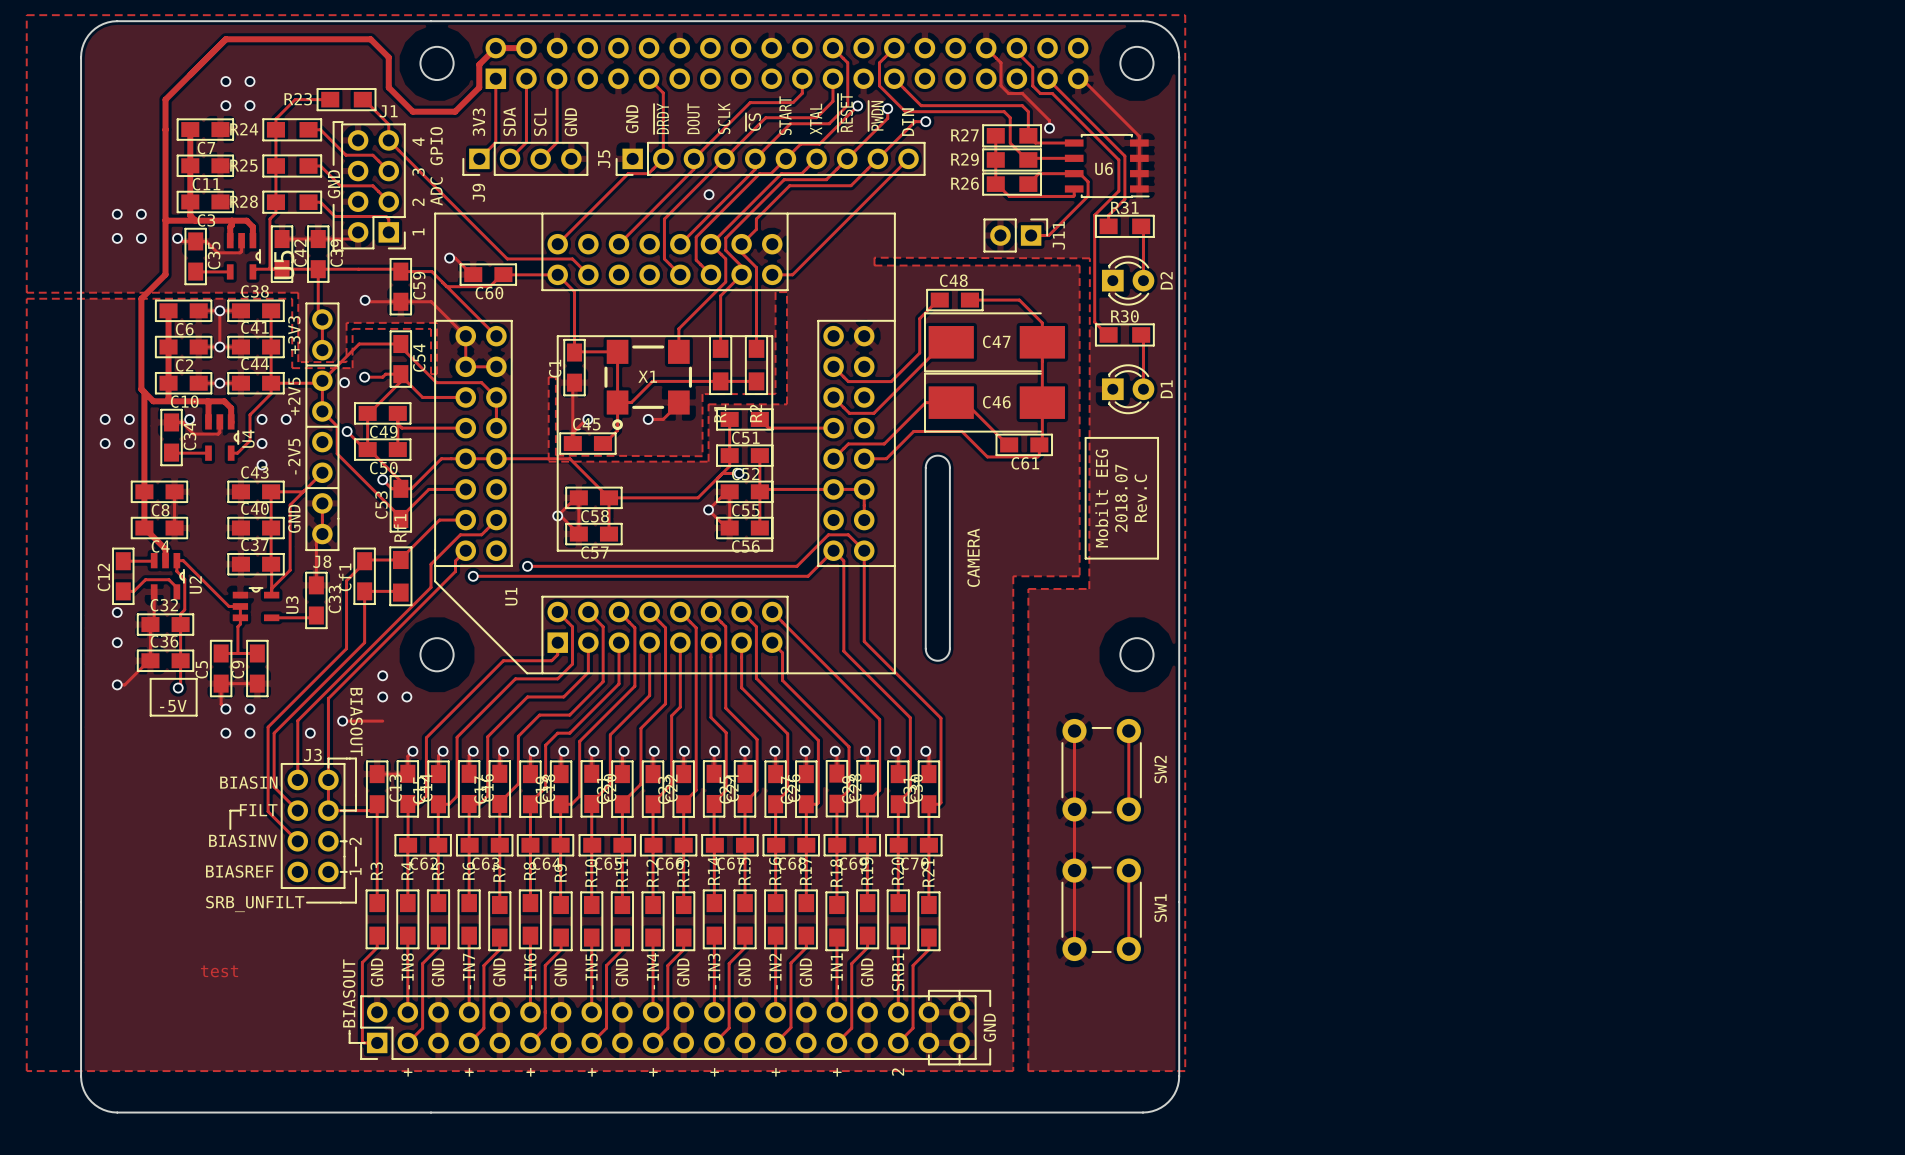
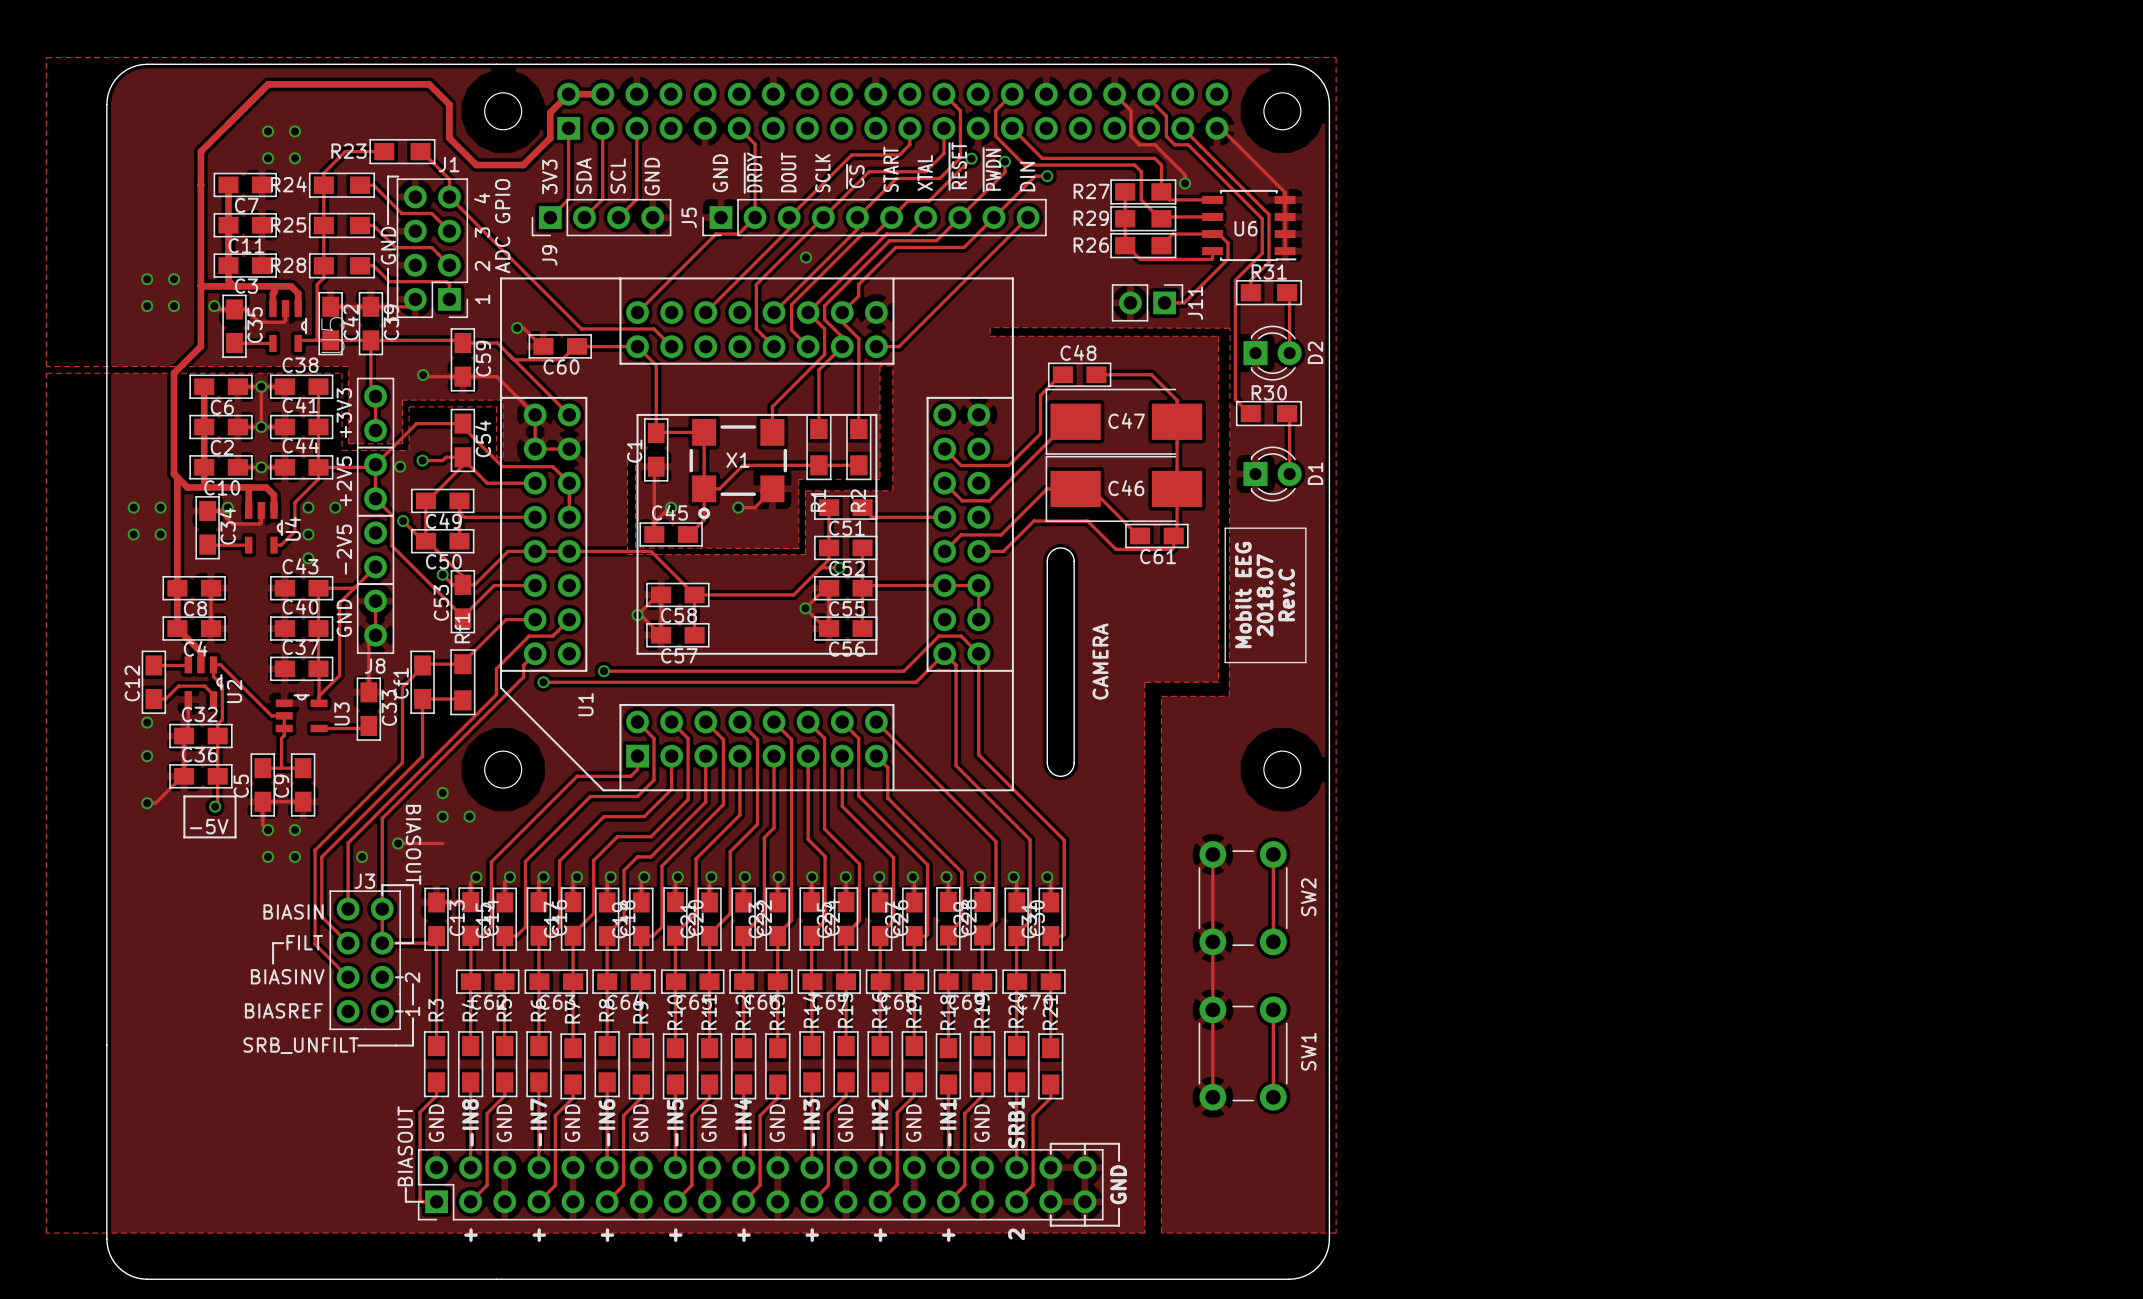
text: test (219, 971) -> none

